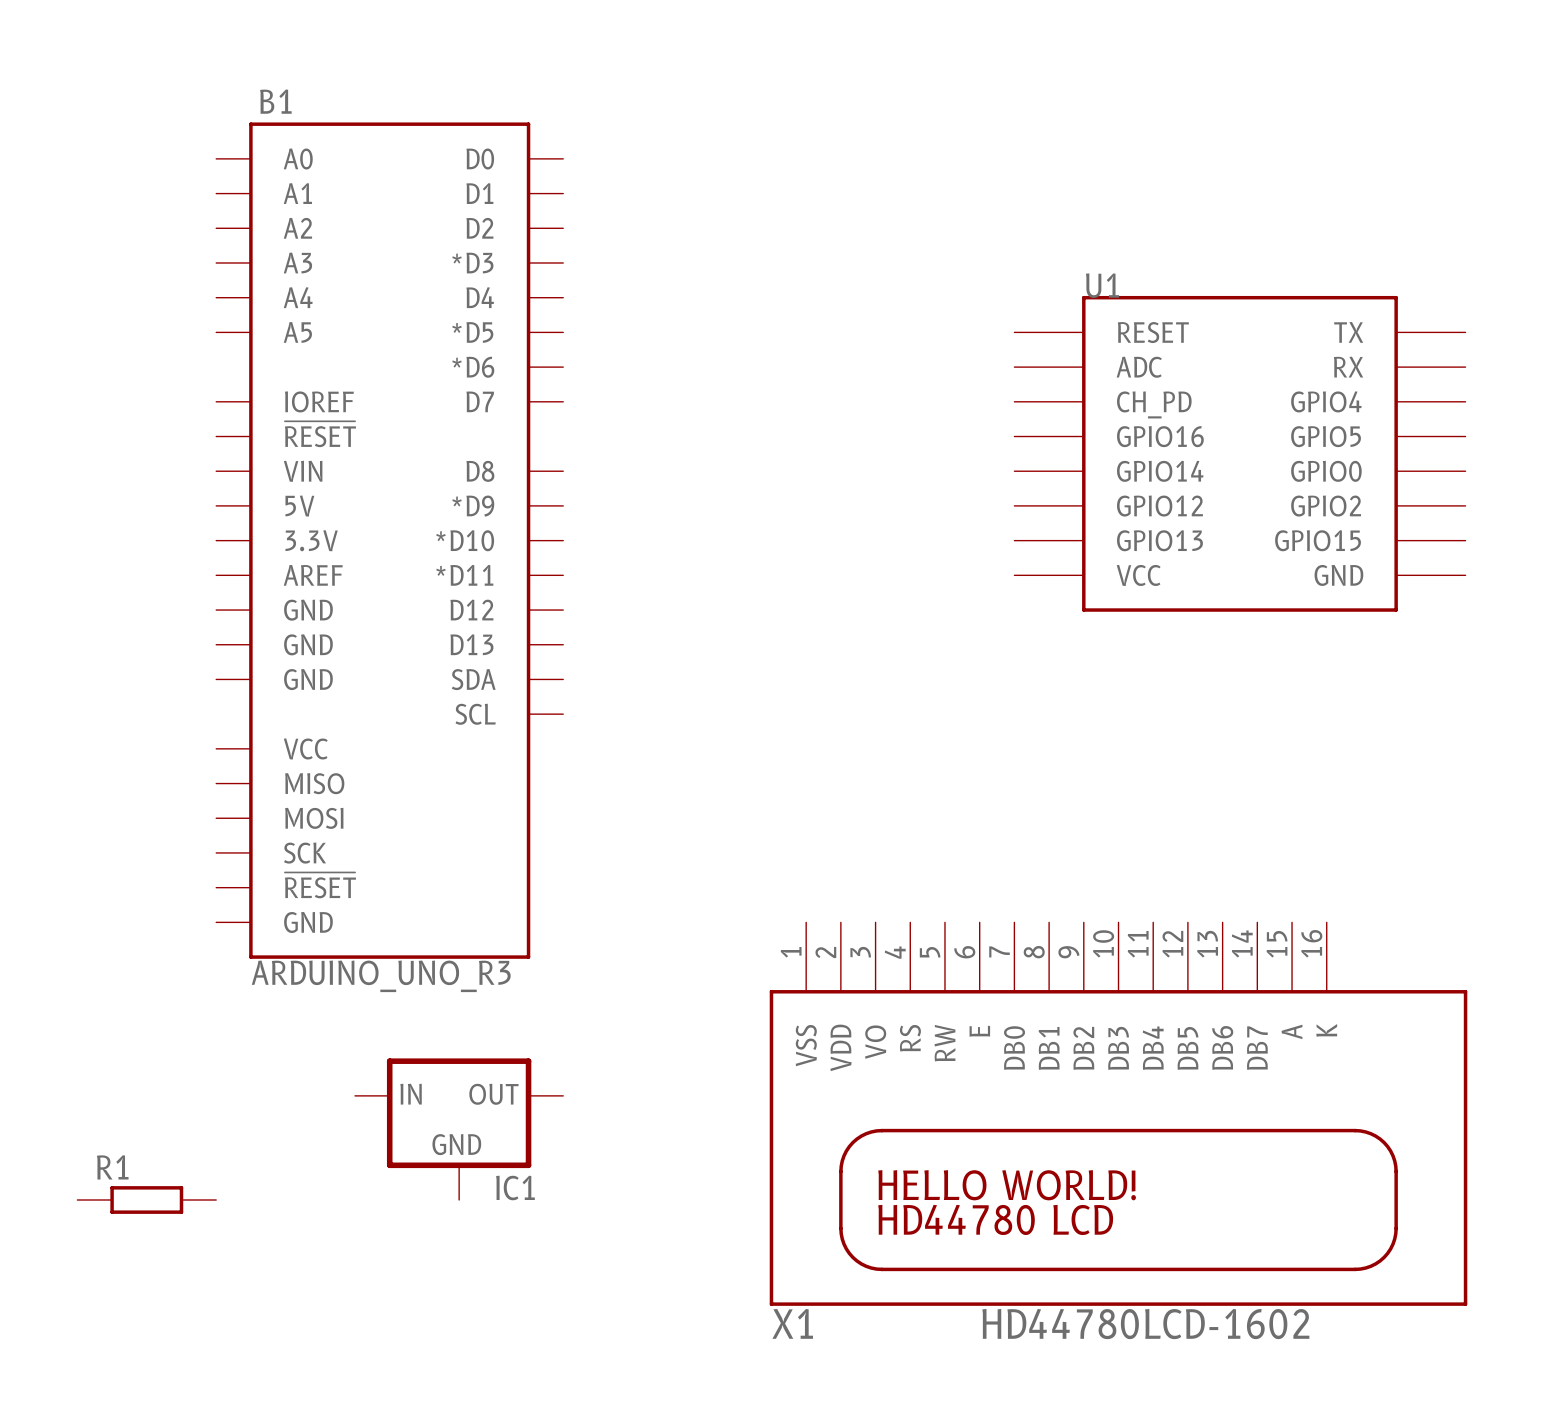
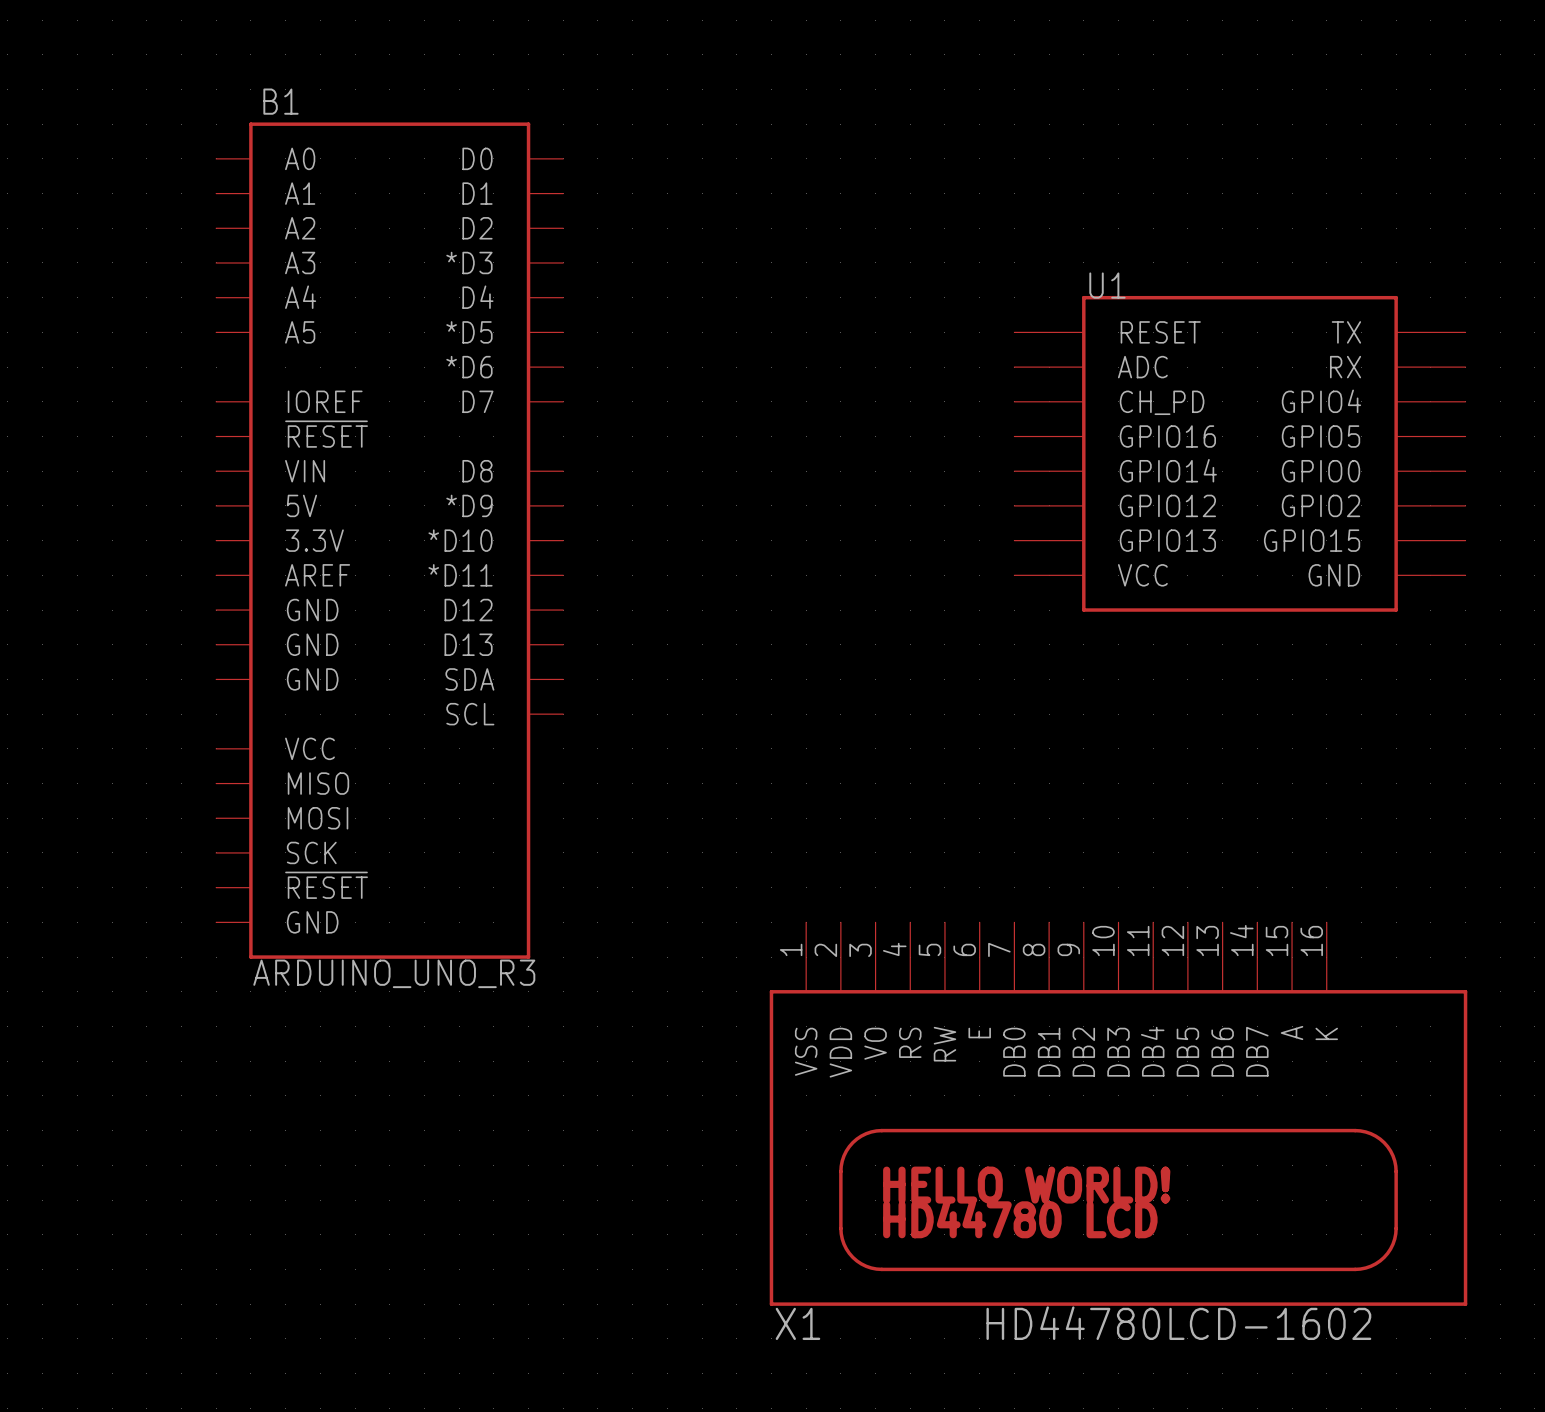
IC1: (459, 1129) -> none
R1: (146, 1200) -> none

